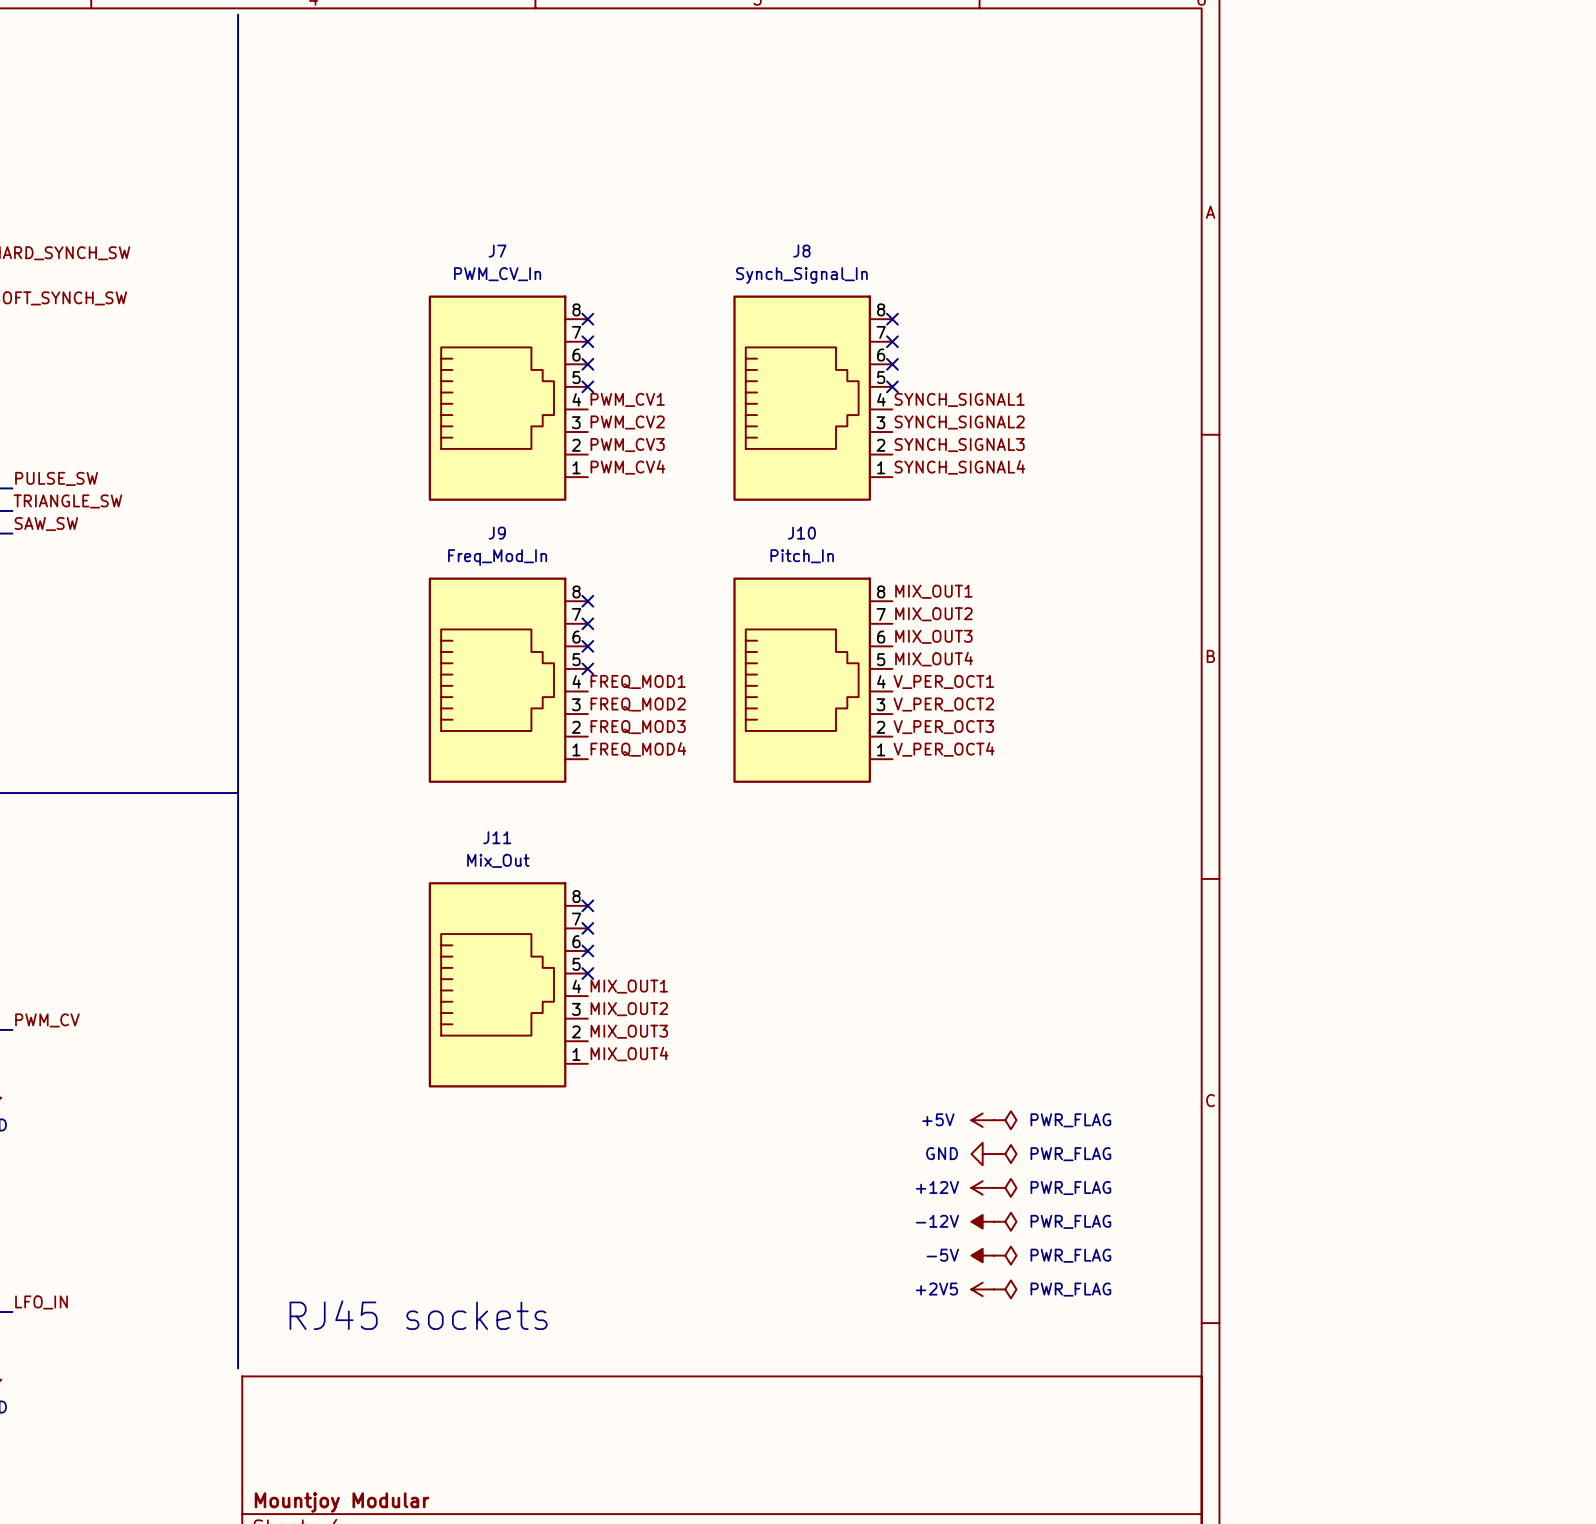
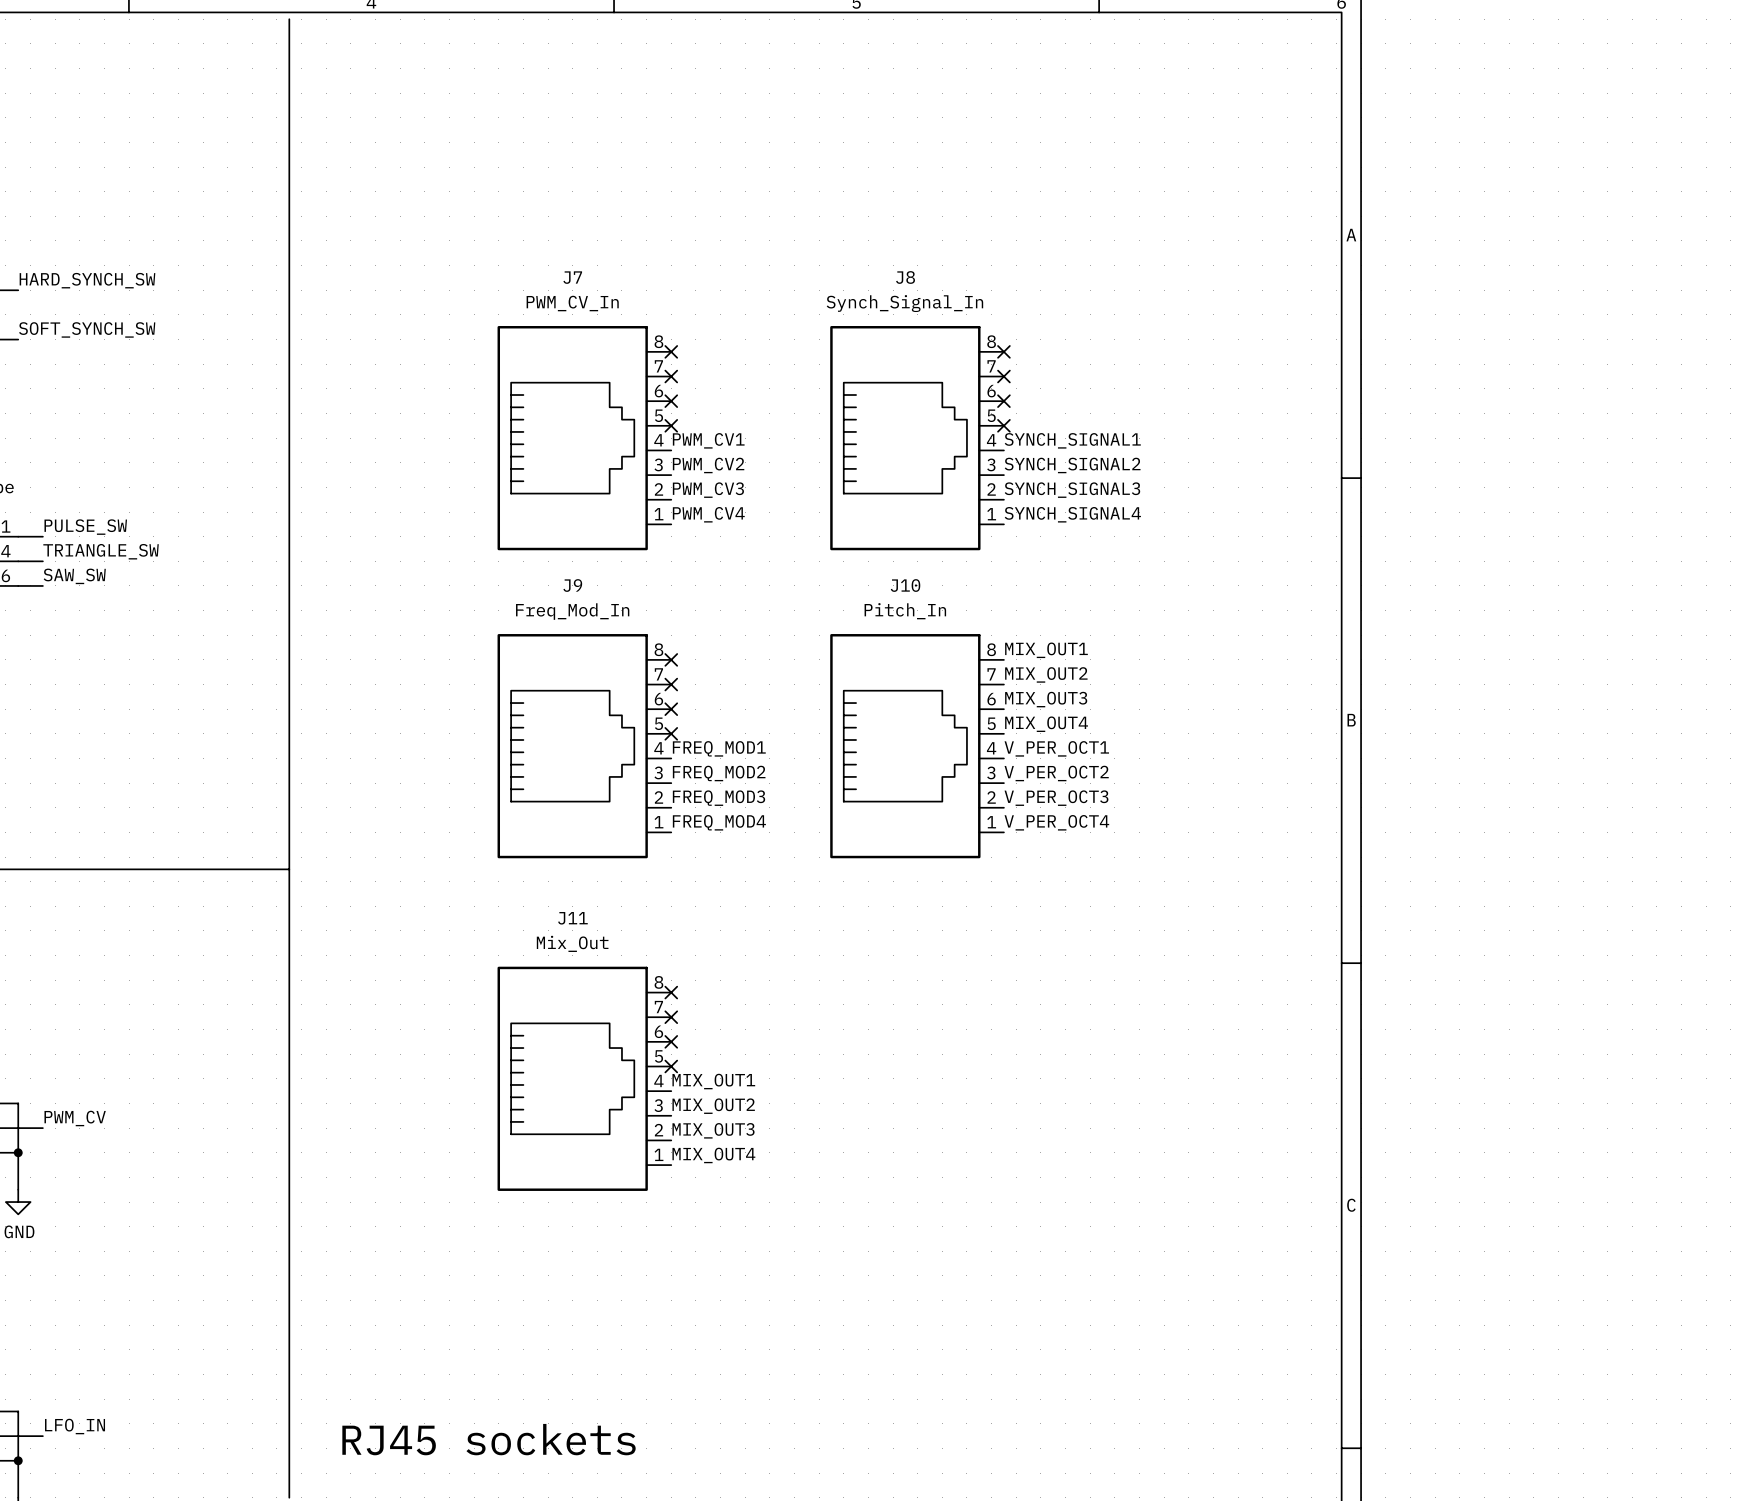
power symbol: +5V (982, 1120) -> none
power symbol: PWR_FLAG (1005, 1120) -> none
power symbol: GND (982, 1154) -> none
power symbol: PWR_FLAG (1005, 1154) -> none
power symbol: +12V (982, 1187) -> none
power symbol: PWR_FLAG (1005, 1187) -> none
power symbol: -12V (982, 1221) -> none
power symbol: PWR_FLAG (1005, 1221) -> none
power symbol: -5V (982, 1255) -> none
power symbol: PWR_FLAG (1005, 1255) -> none
power symbol: +2V5 (982, 1289) -> none
power symbol: PWR_FLAG (1005, 1289) -> none

